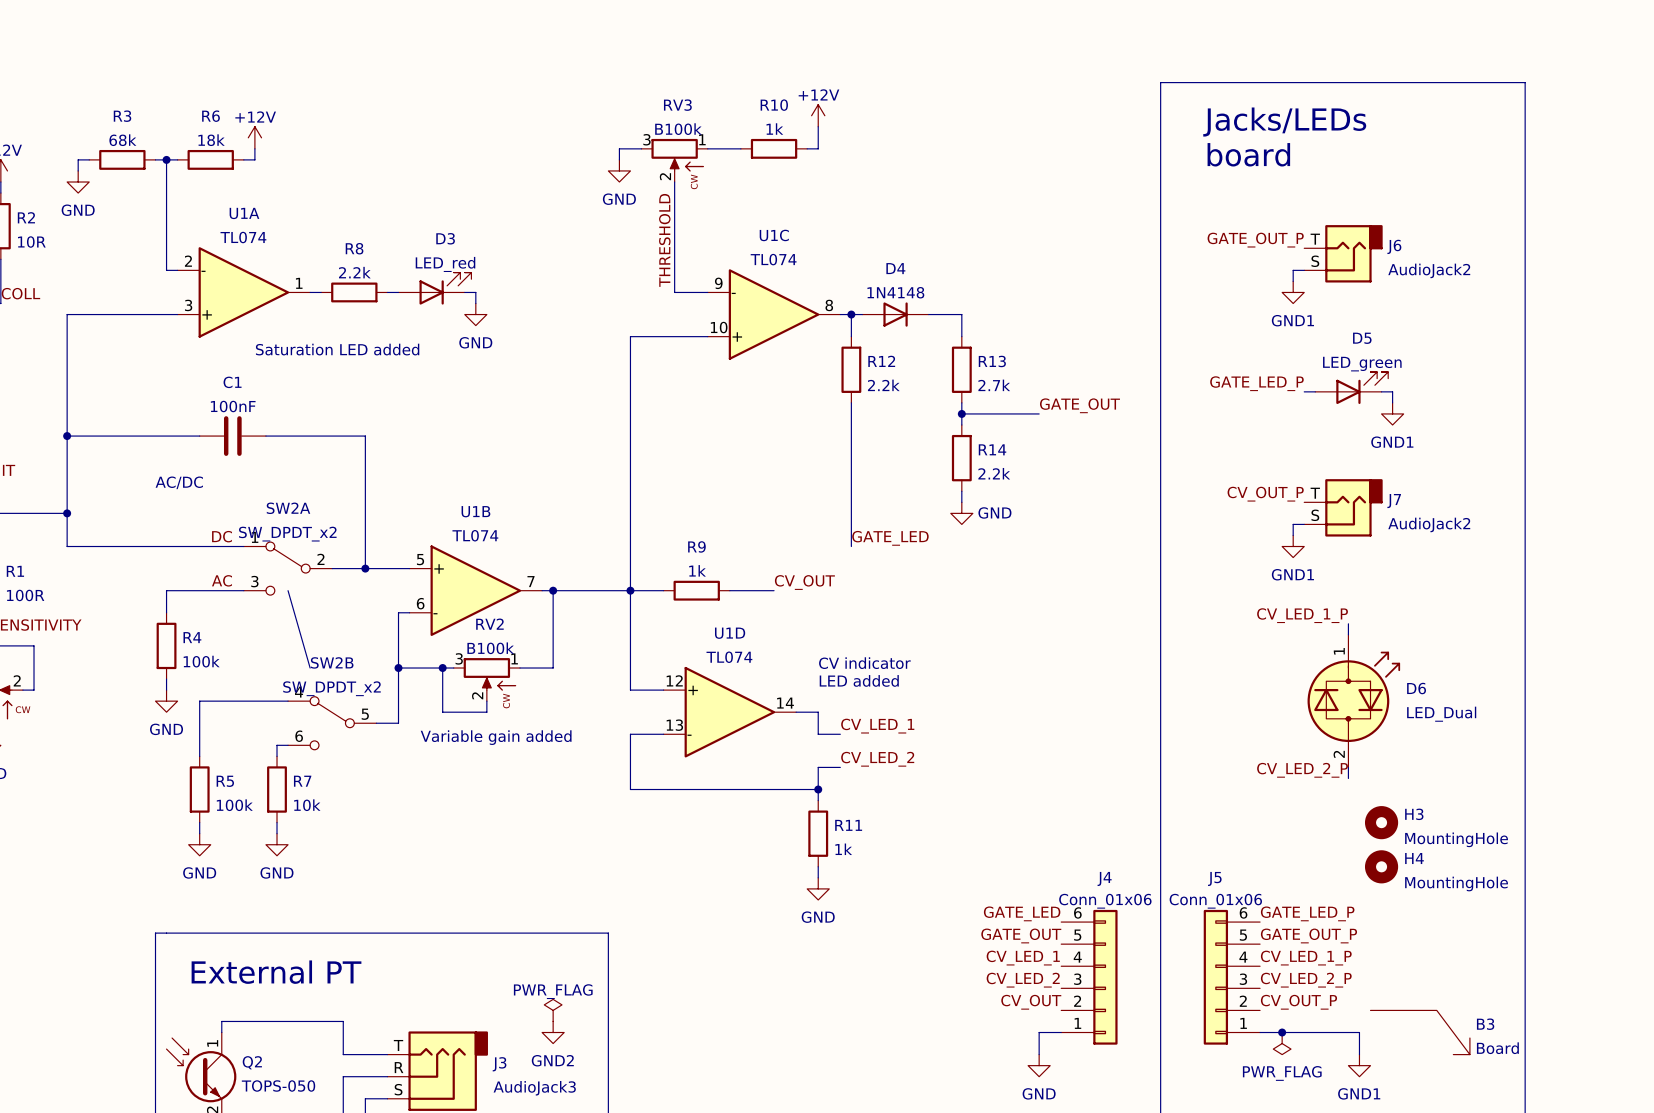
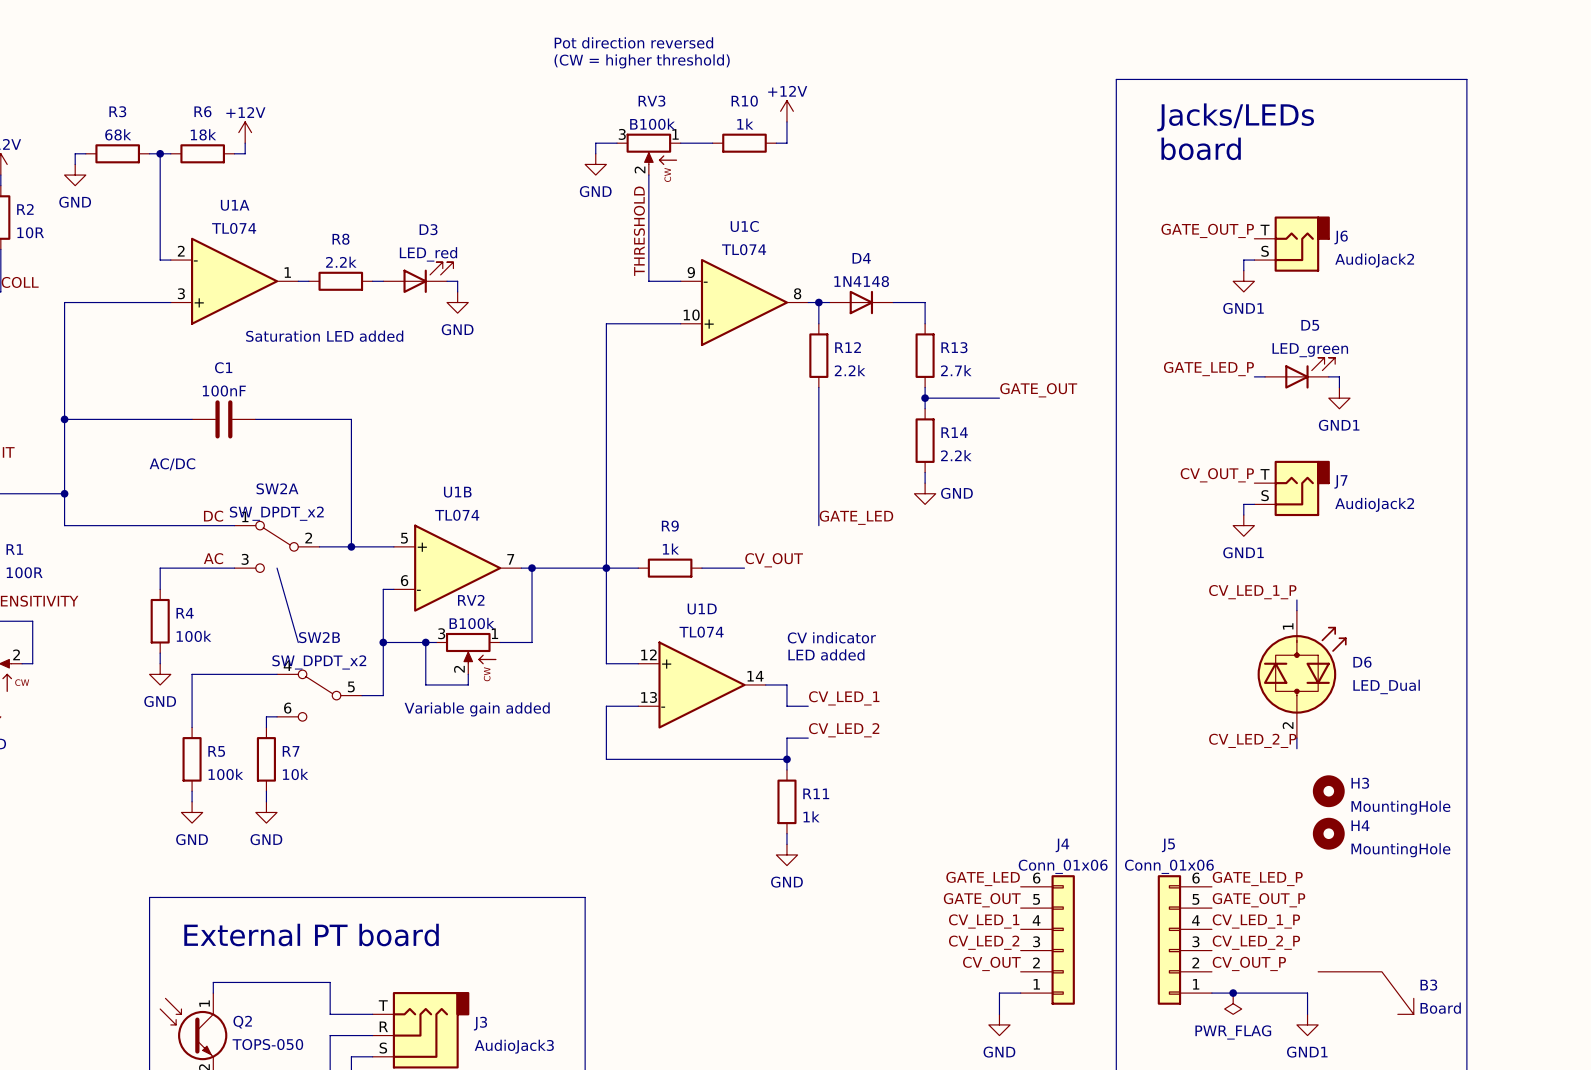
text: none -> Pot direction reversed (633, 42)
text: none -> (CW = higher threshold) (642, 61)
text: External PT (276, 972) -> External PT board (311, 935)
power symbol: PWR_FLAG (553, 1010) -> none
power symbol: GND2 (553, 1032) -> none

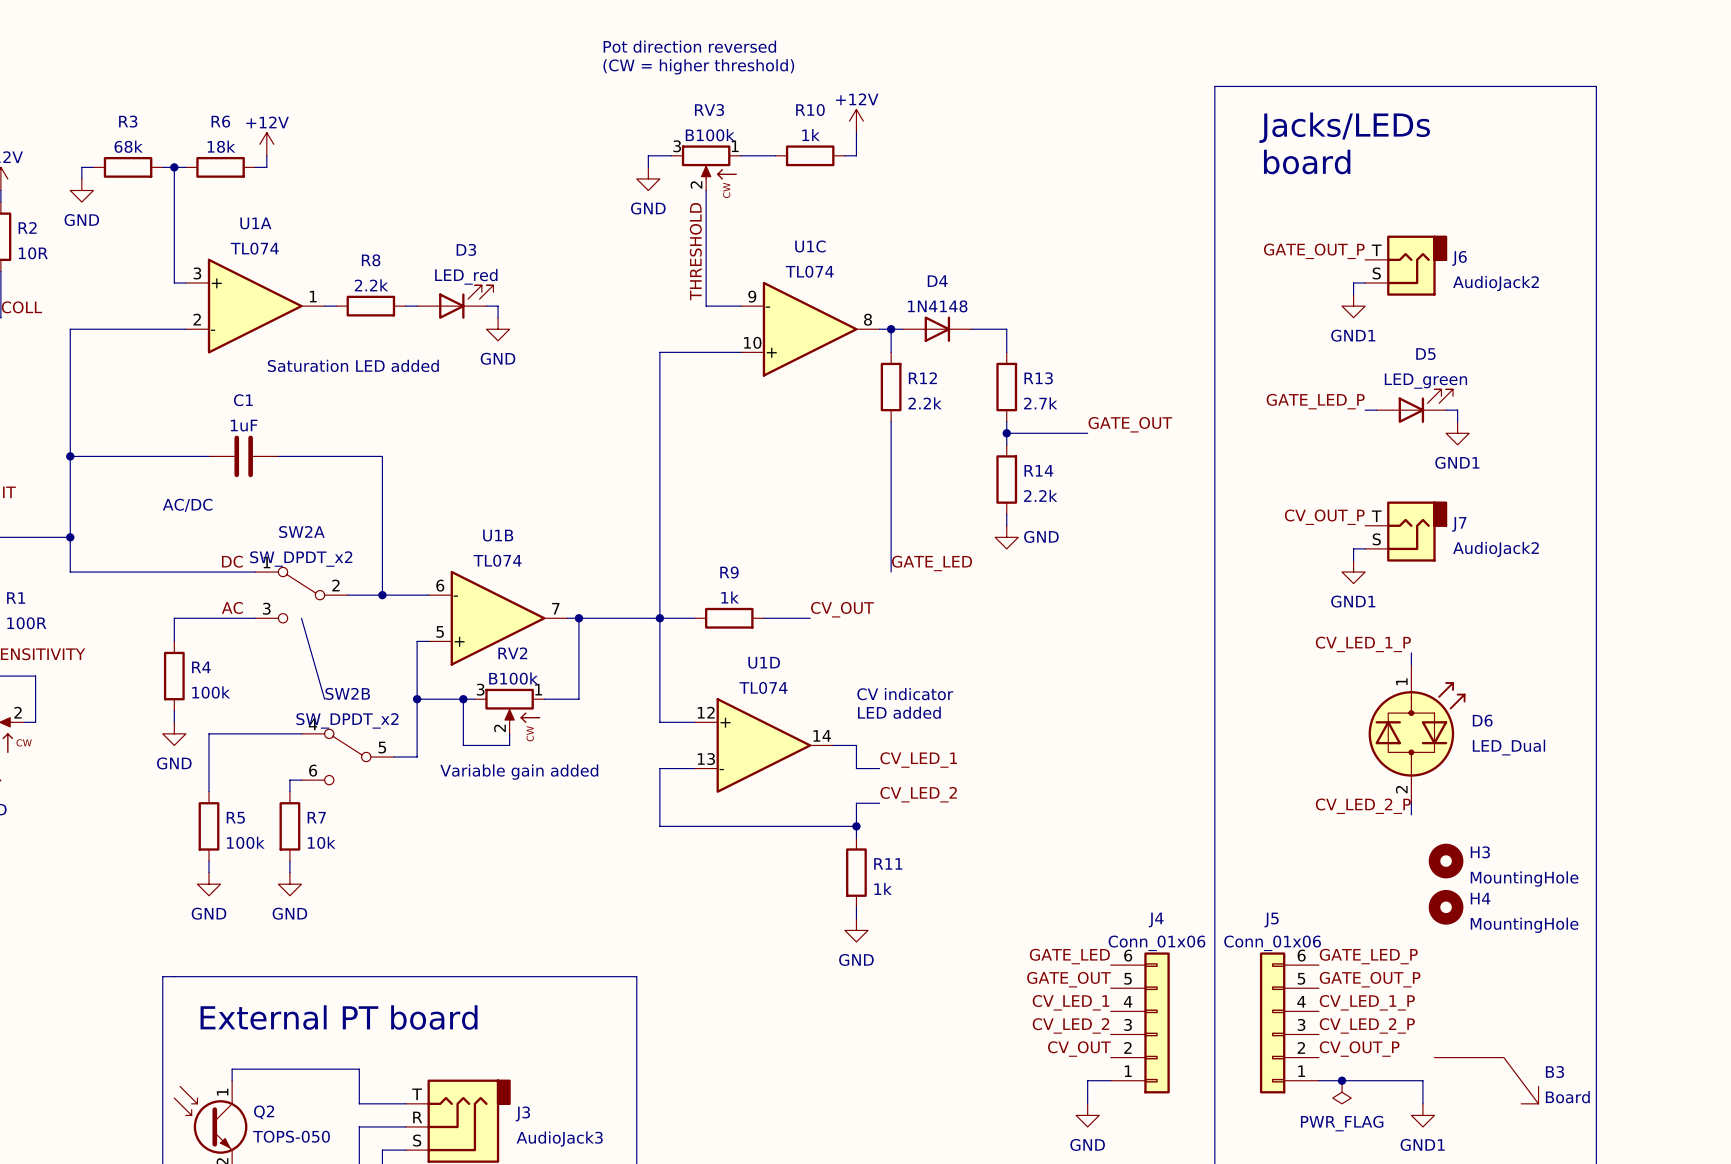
U1A flip: as is (234, 281) -> up-down (255, 306)
C1 value: 100nF (224, 390) -> 1uF (244, 425)
U1B flip: as is (457, 568) -> up-down (498, 618)

